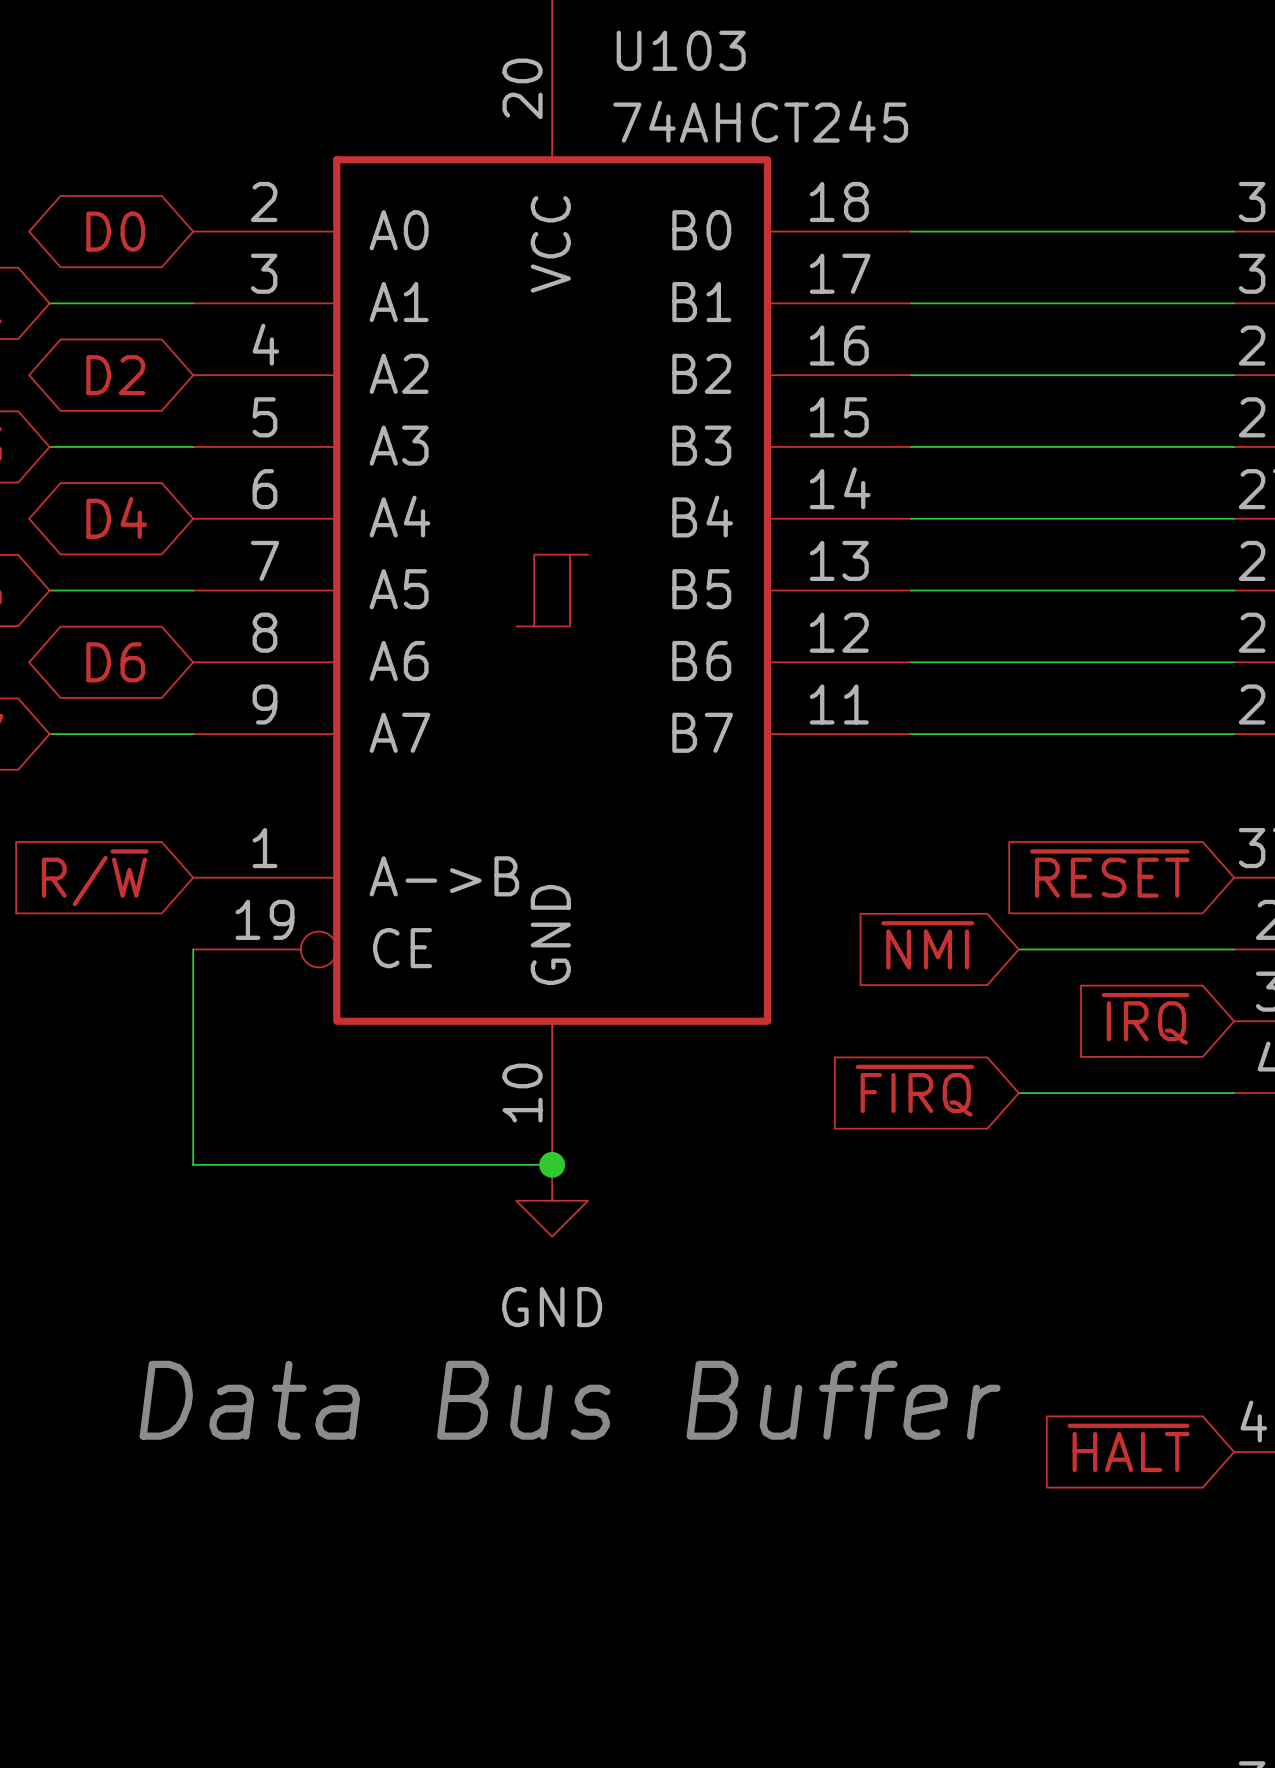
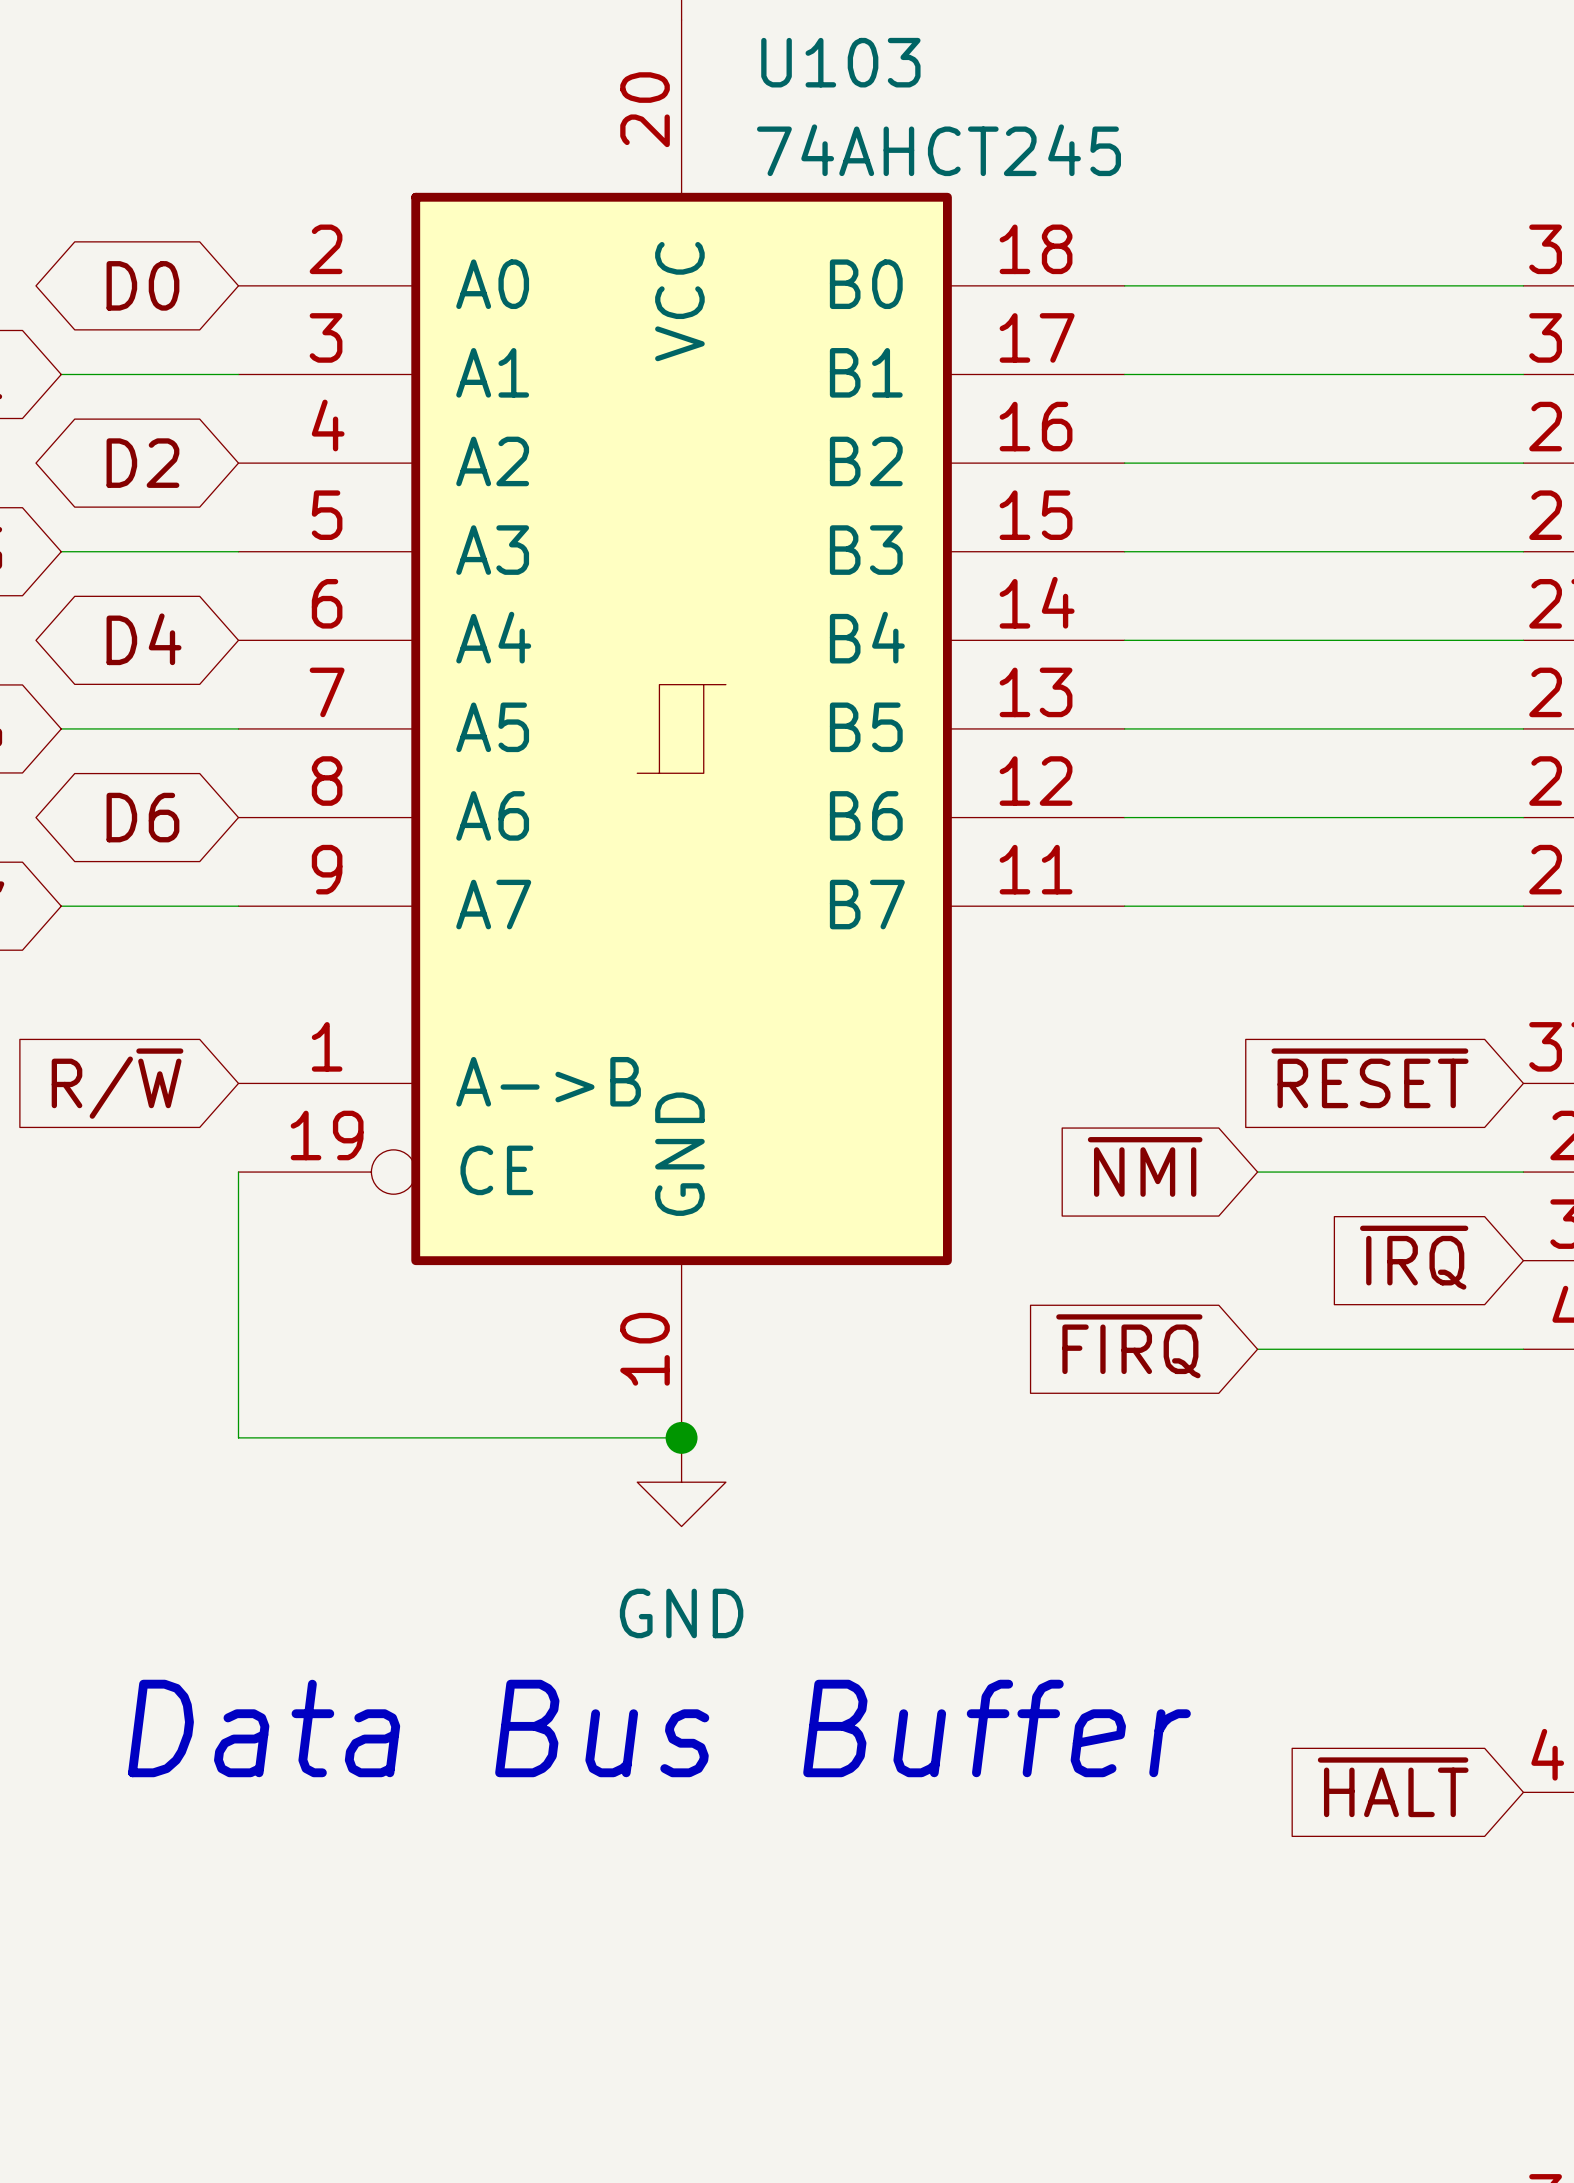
text position: Data Bus Buffer (570, 1400) -> Data Bus Buffer (659, 1728)

